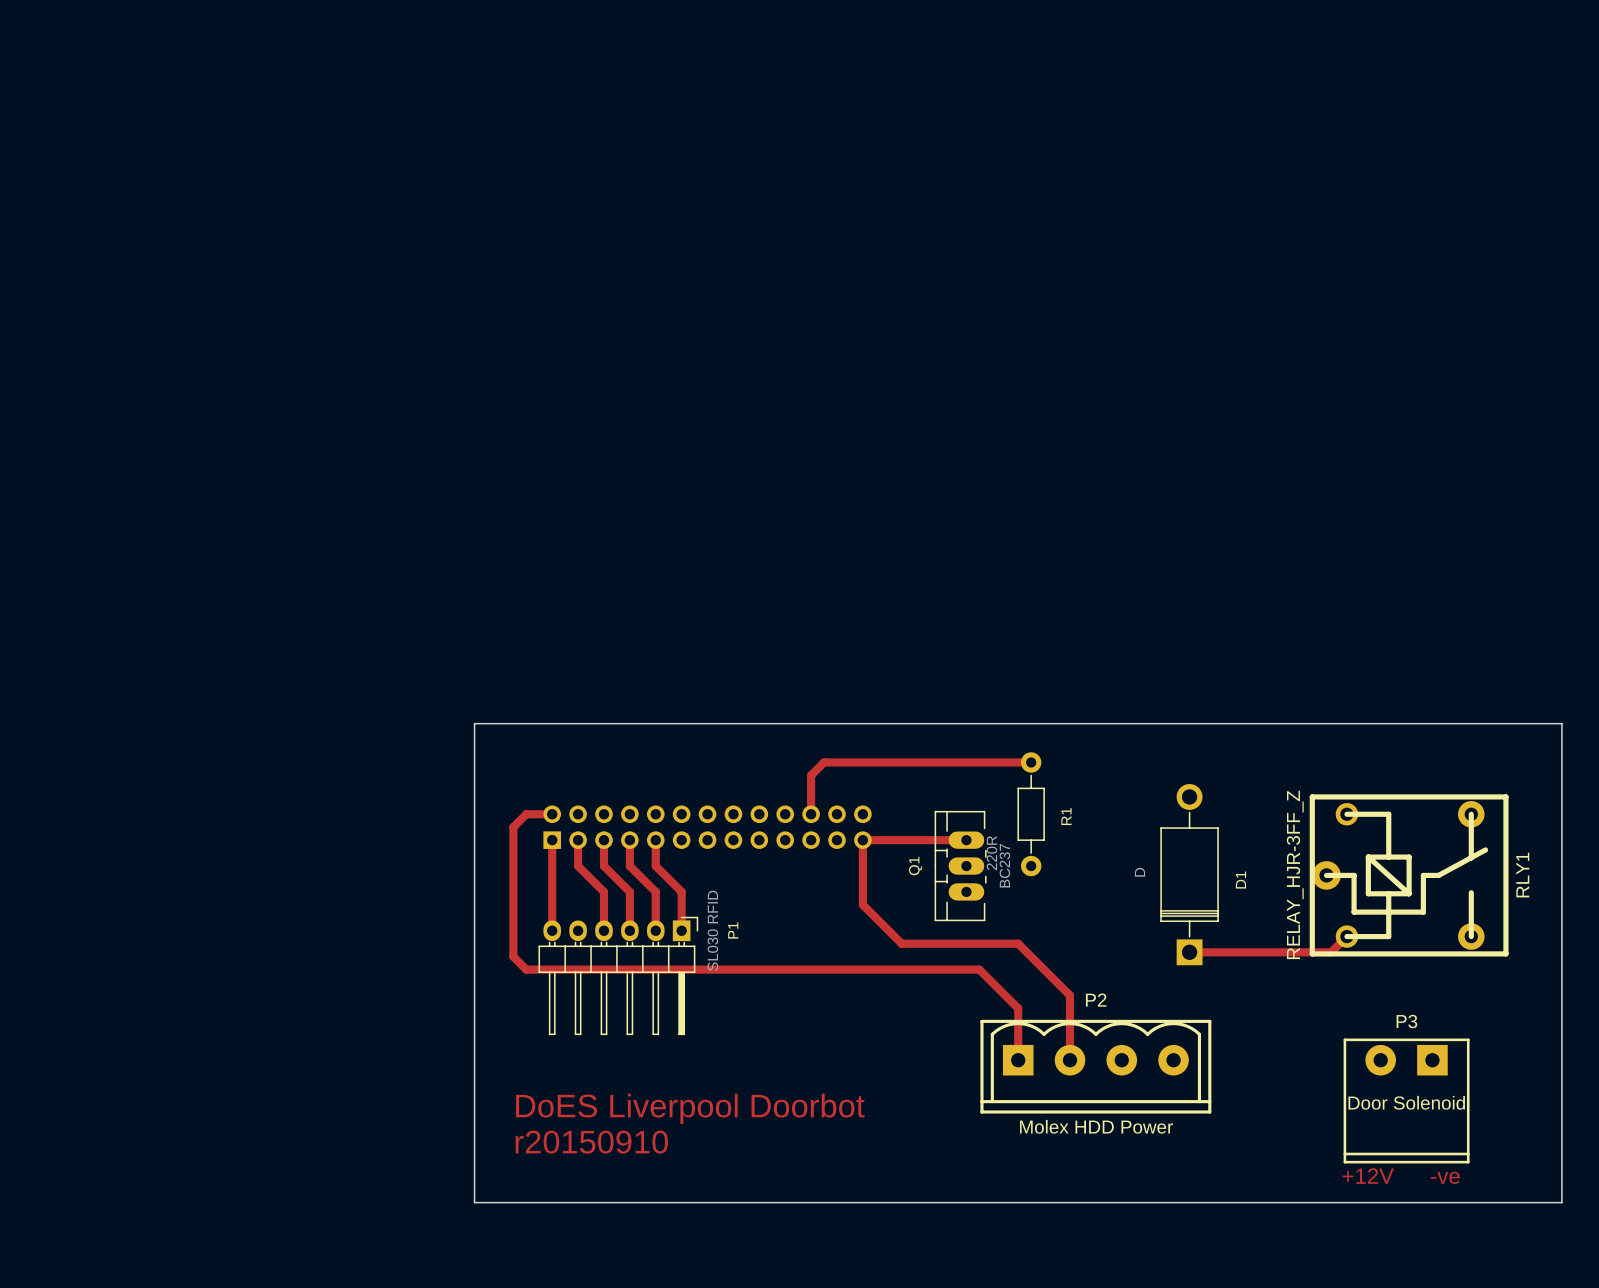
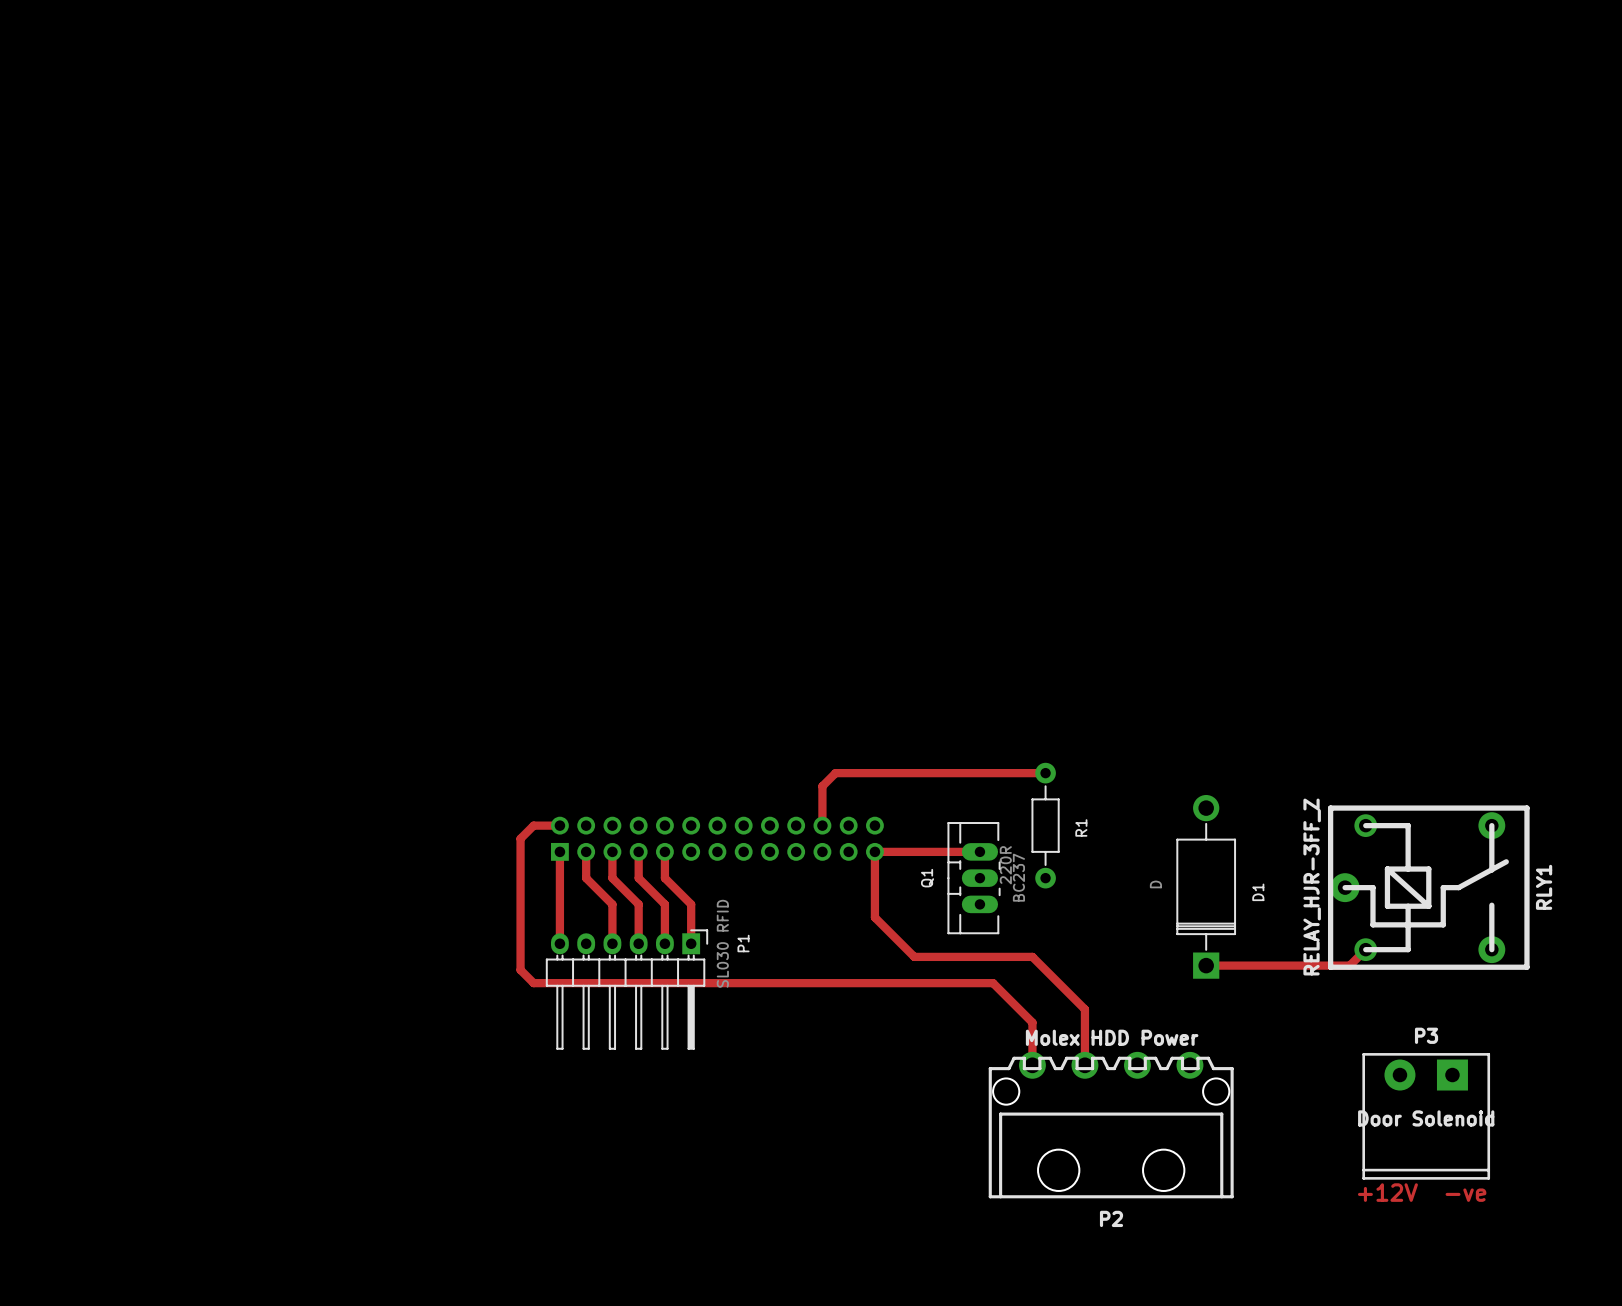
board edge: (474, 723) (1561, 723) (1561, 1202) (474, 1202) (474, 723) -> none
P2 name position: P2 (1096, 1000) -> P2 (1111, 1218)
P2 footprint: [980, 1019, 1212, 1114] -> [988, 1051, 1234, 1199]
text: DoES Liverpool Doorbot (690, 1108) -> none
P2 value position: Molex HDD Power (1096, 1126) -> Molex HDD Power (1112, 1037)
text: r20150910 (591, 1142) -> none

